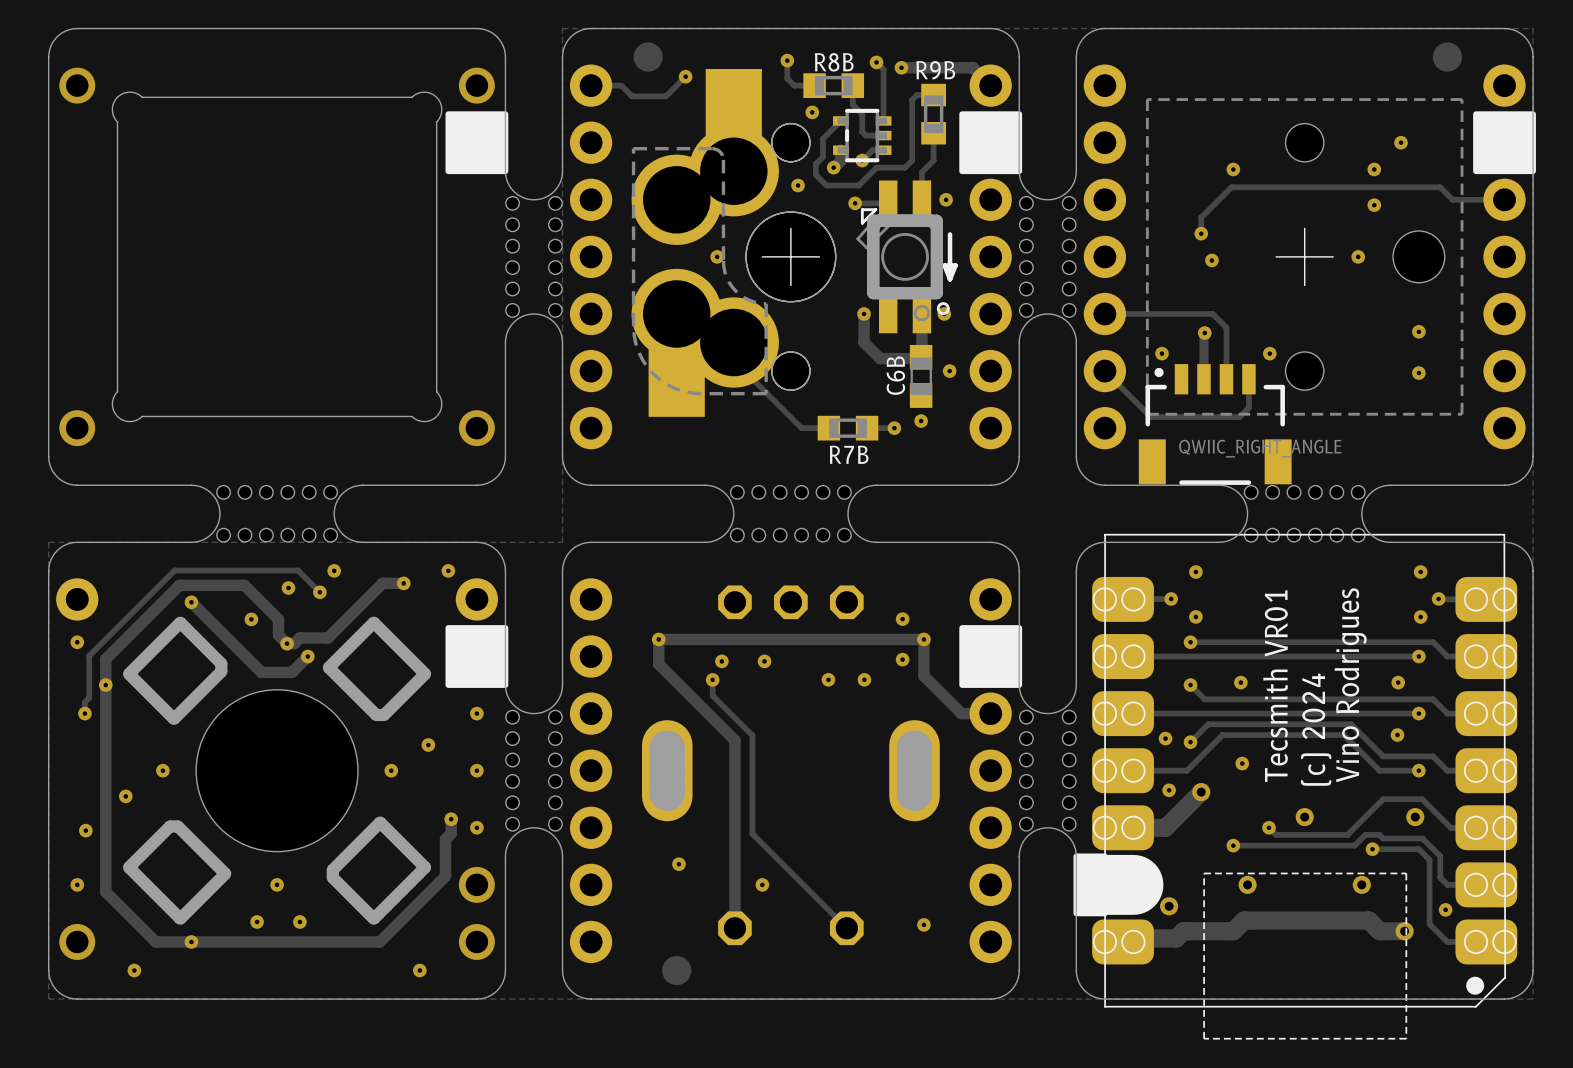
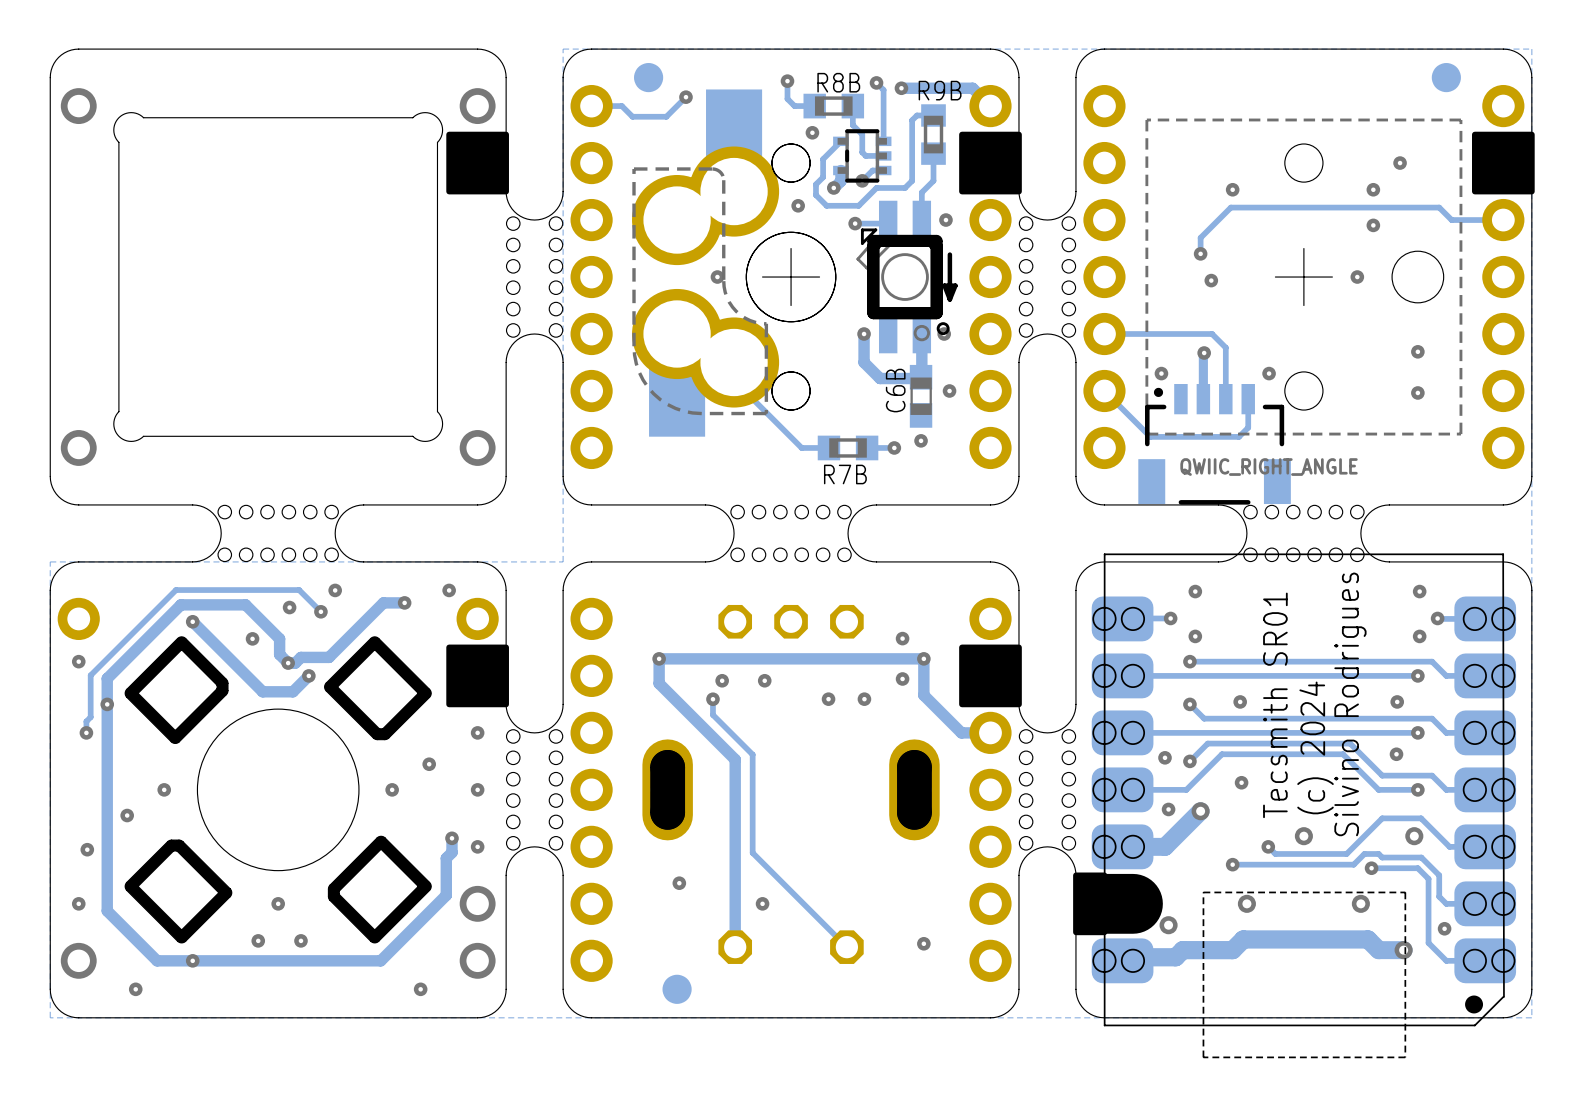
text: Vino Rodrigues (1350, 685) -> Silvino Rodrigues (1350, 704)
text: Tecsmith VR01 (1275, 686) -> Tecsmith SR01 (1275, 705)

